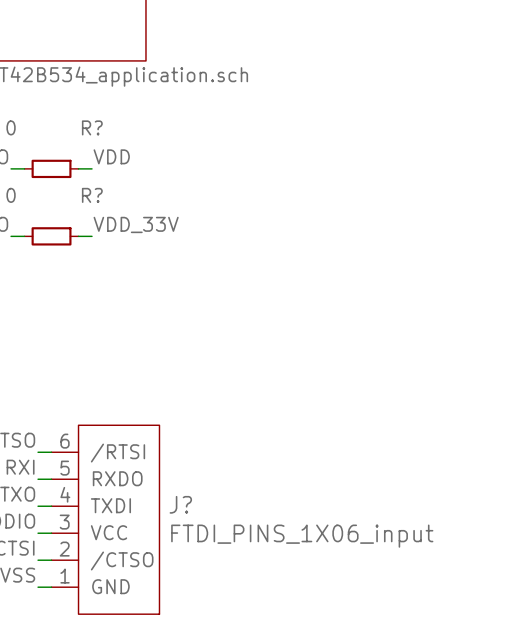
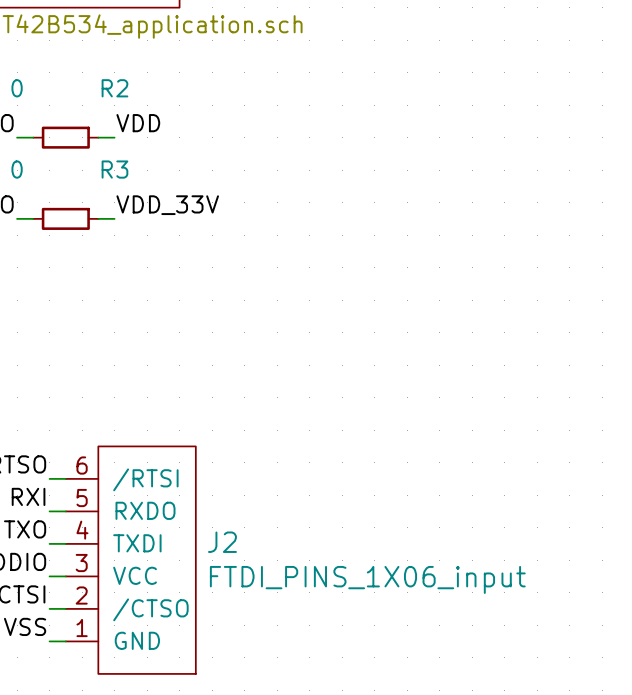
R? name: R? (92, 127) -> R2 (114, 88)
R? name: R? (92, 195) -> R3 (114, 169)
J? name: J? (180, 504) -> J2 (222, 542)

